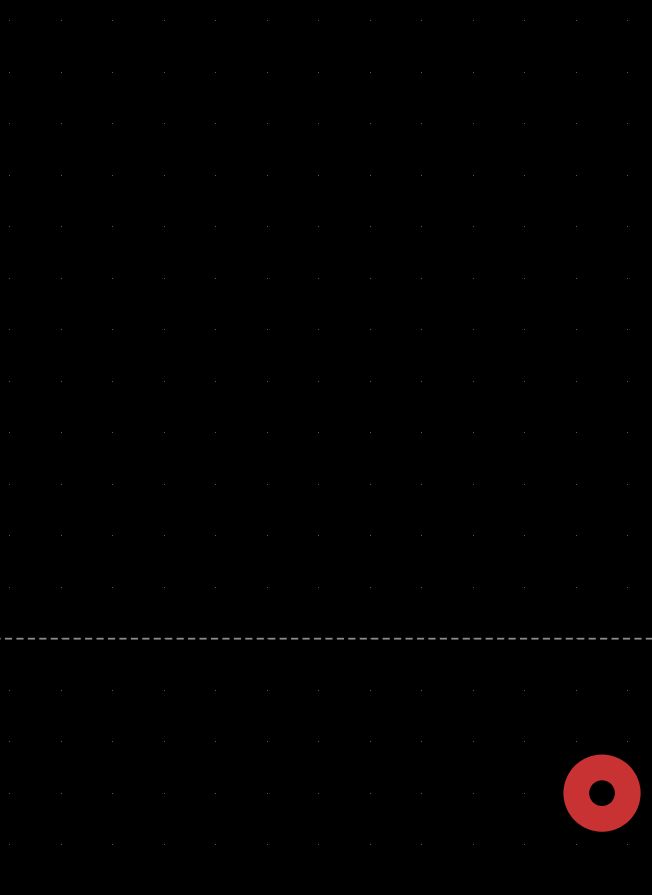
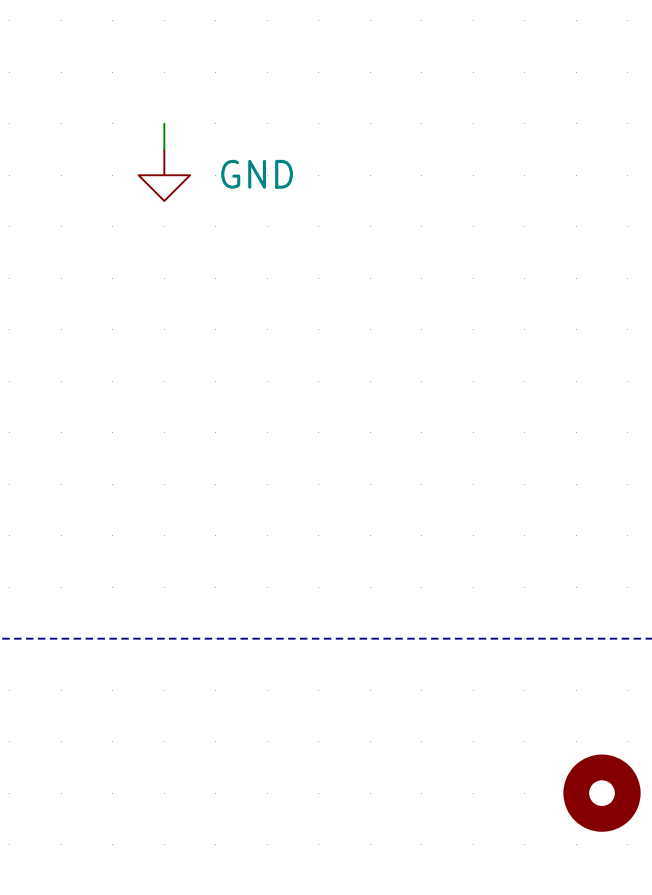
wire: none -> (164, 123) (164, 149)
power symbol: none -> GND (164, 175)

